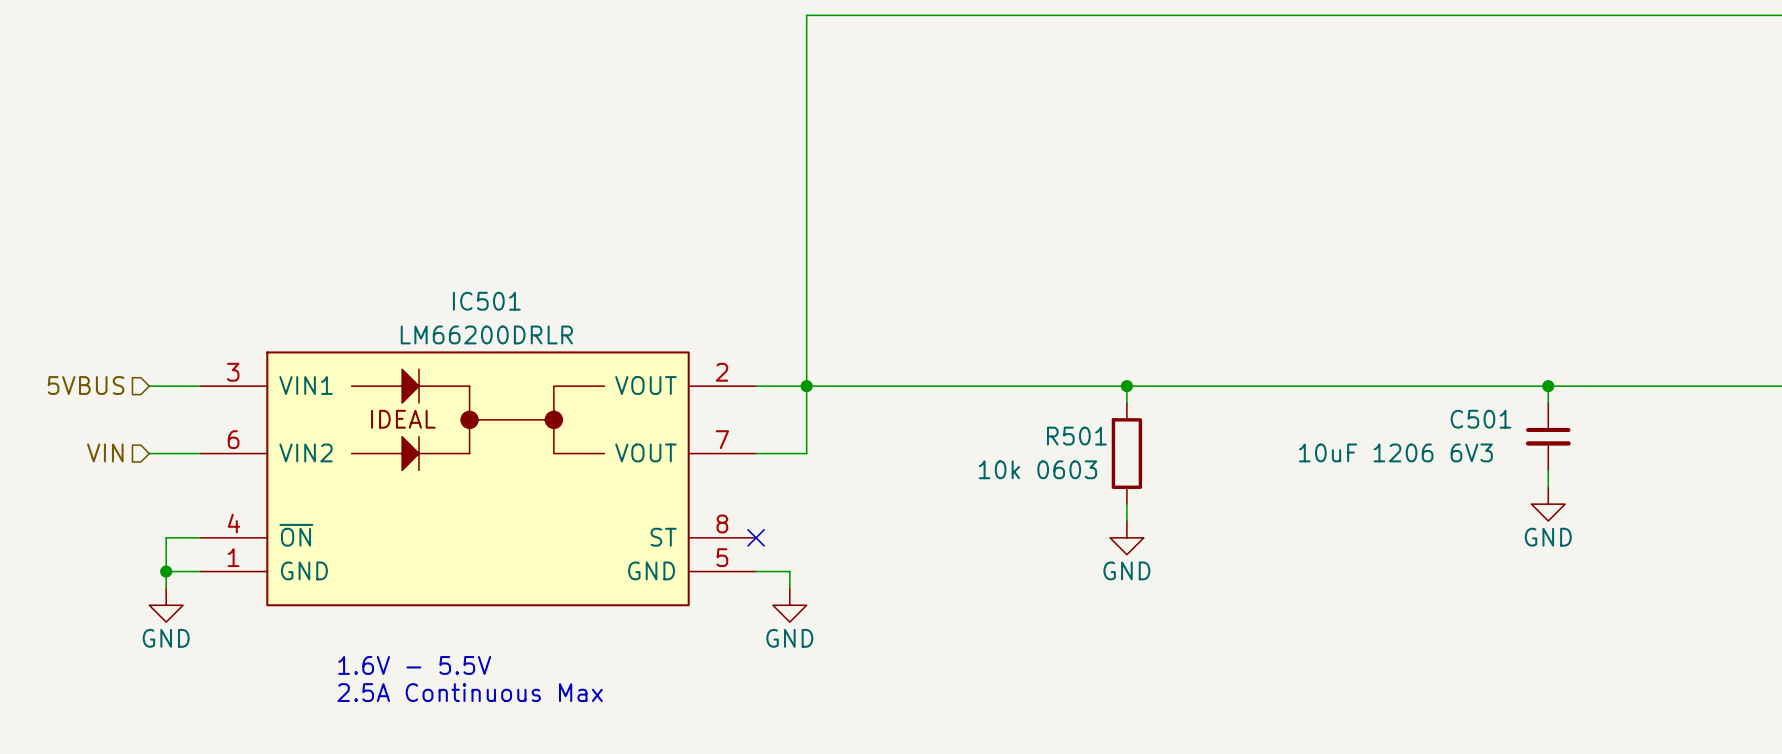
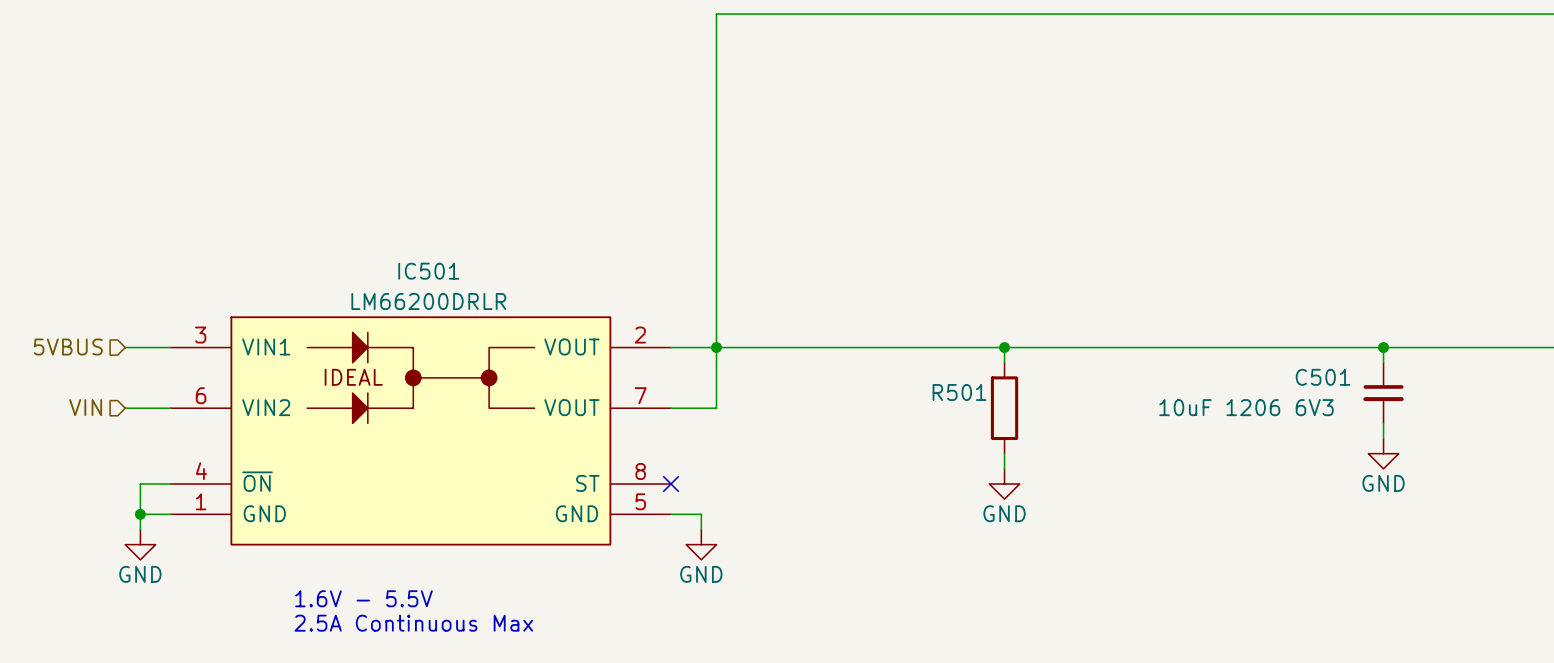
R501 value: 10k 0603 (1037, 469) -> none

